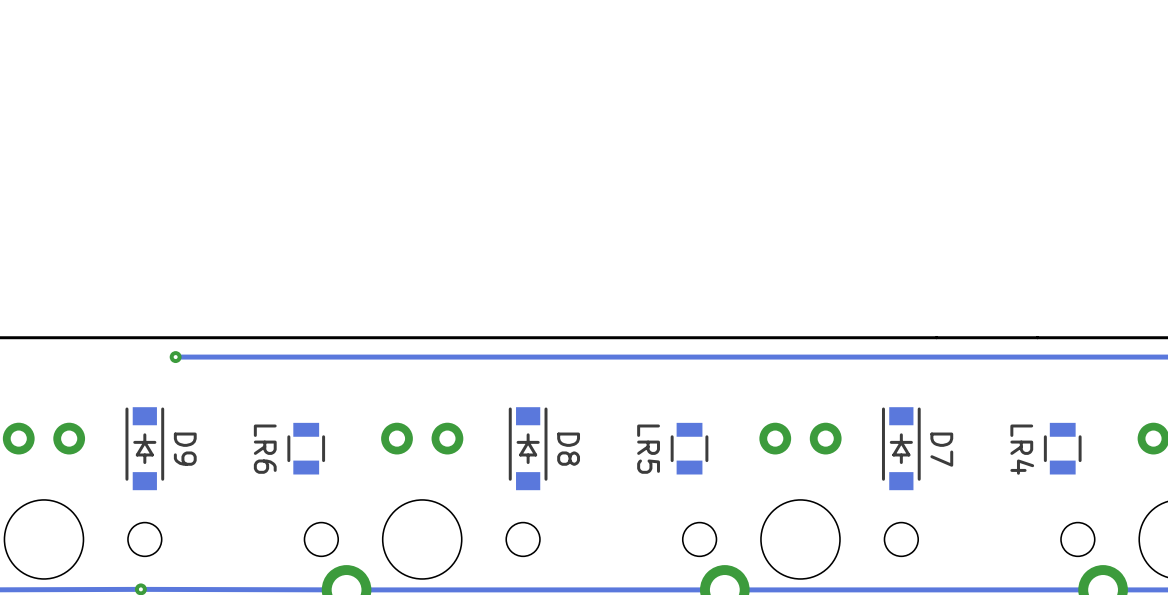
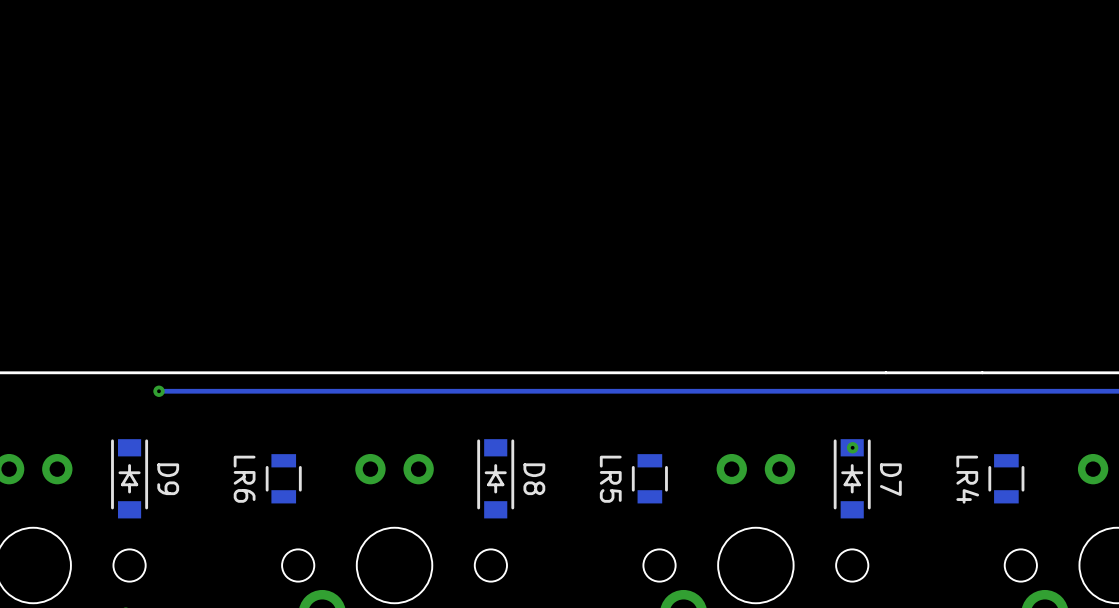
via: none -> (852, 447)

